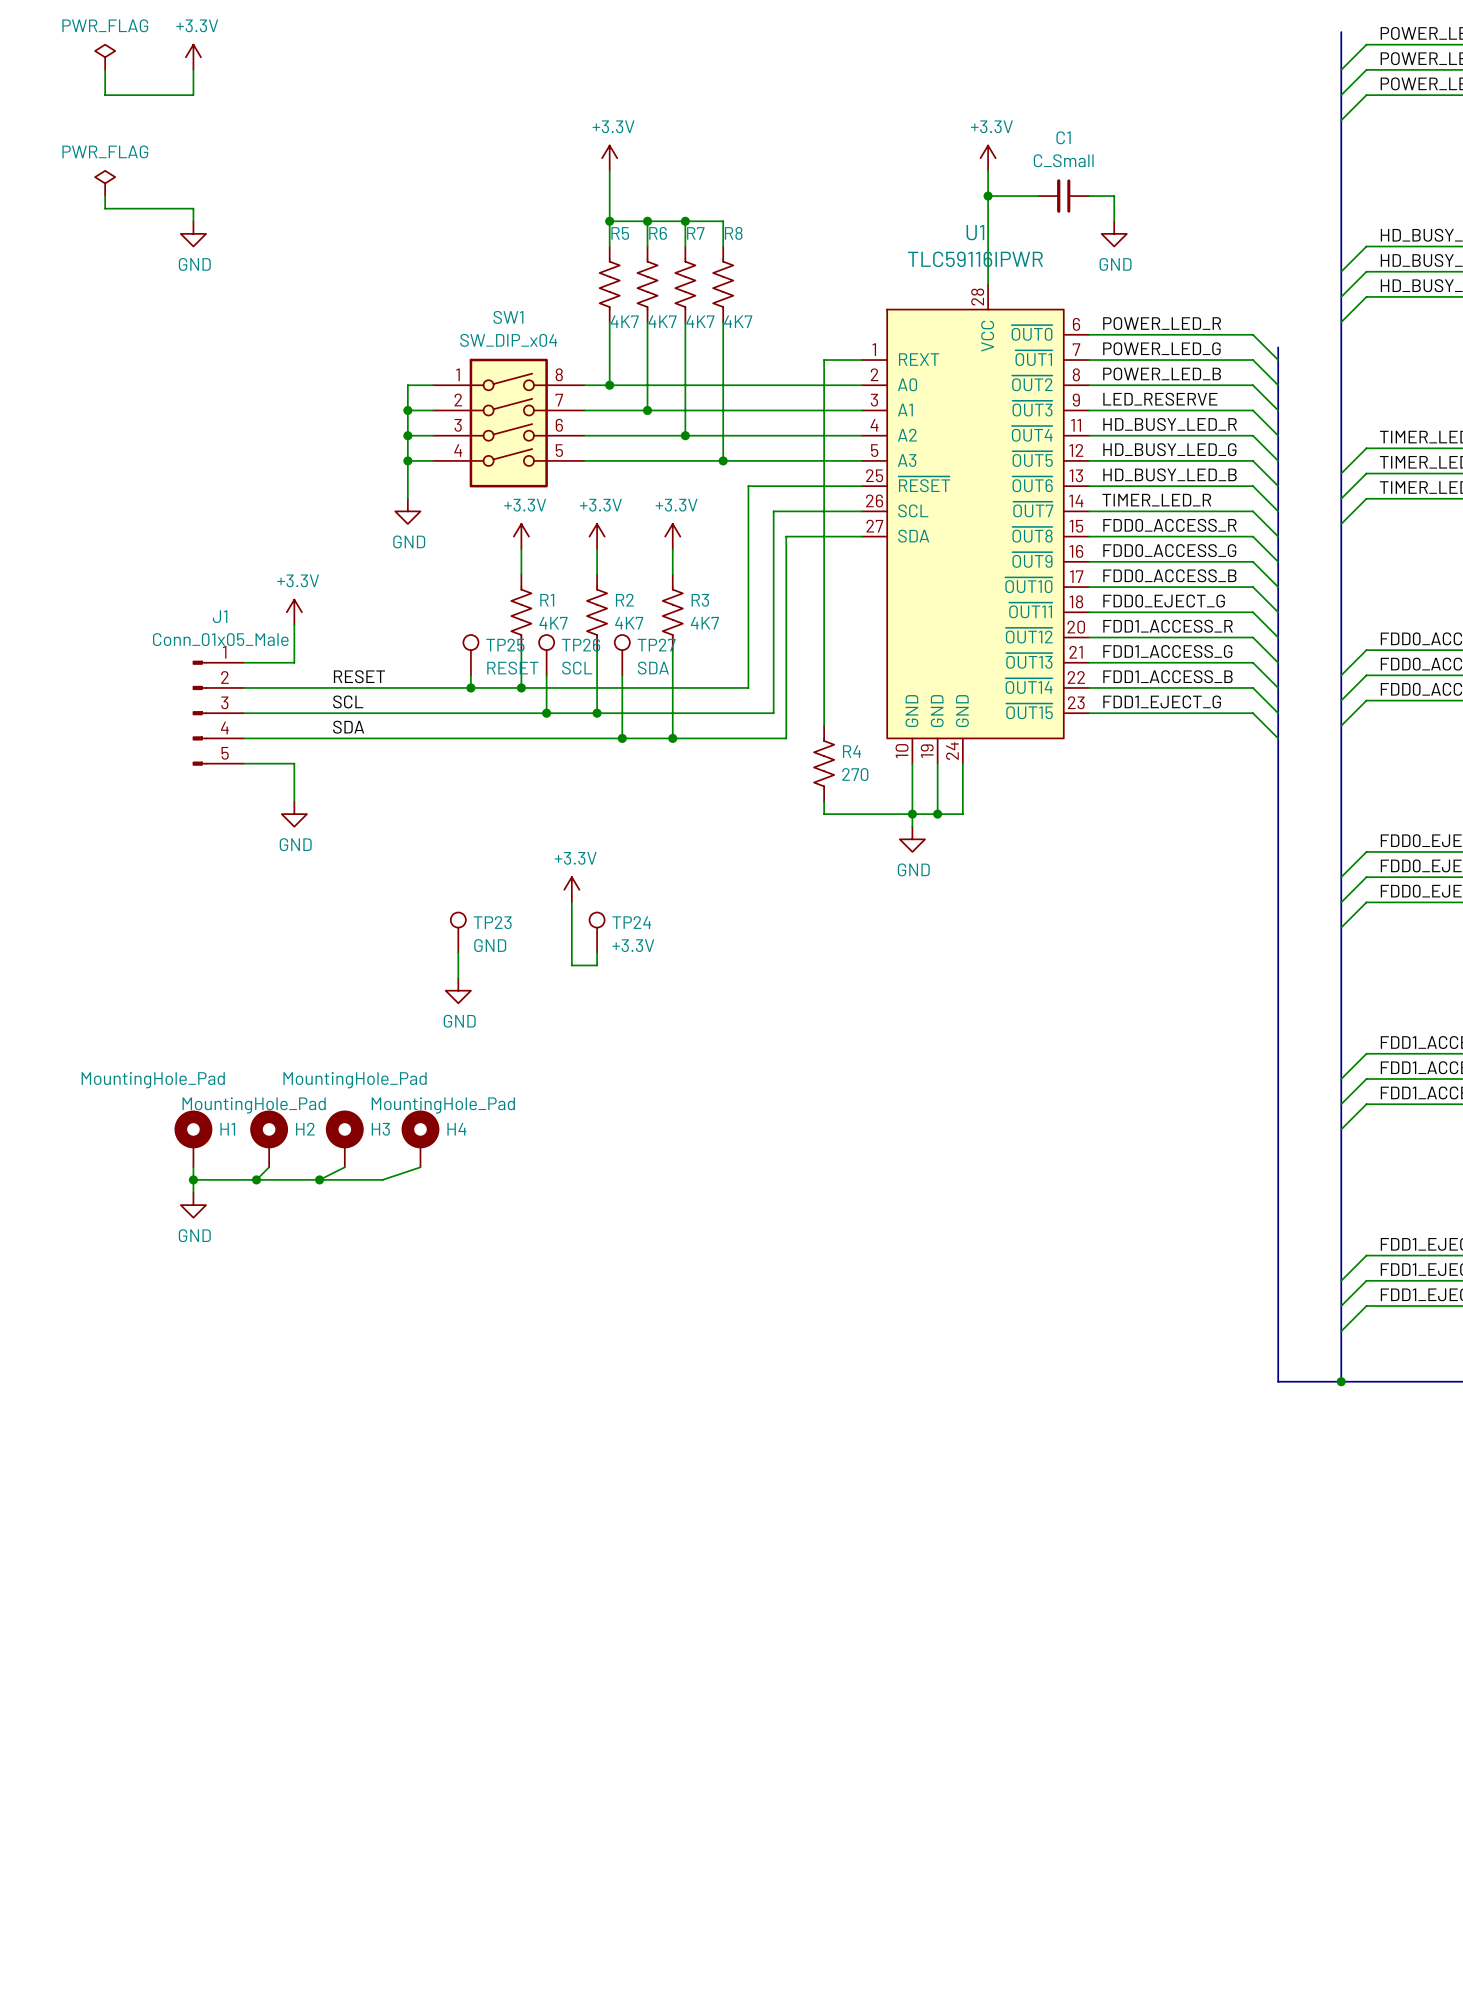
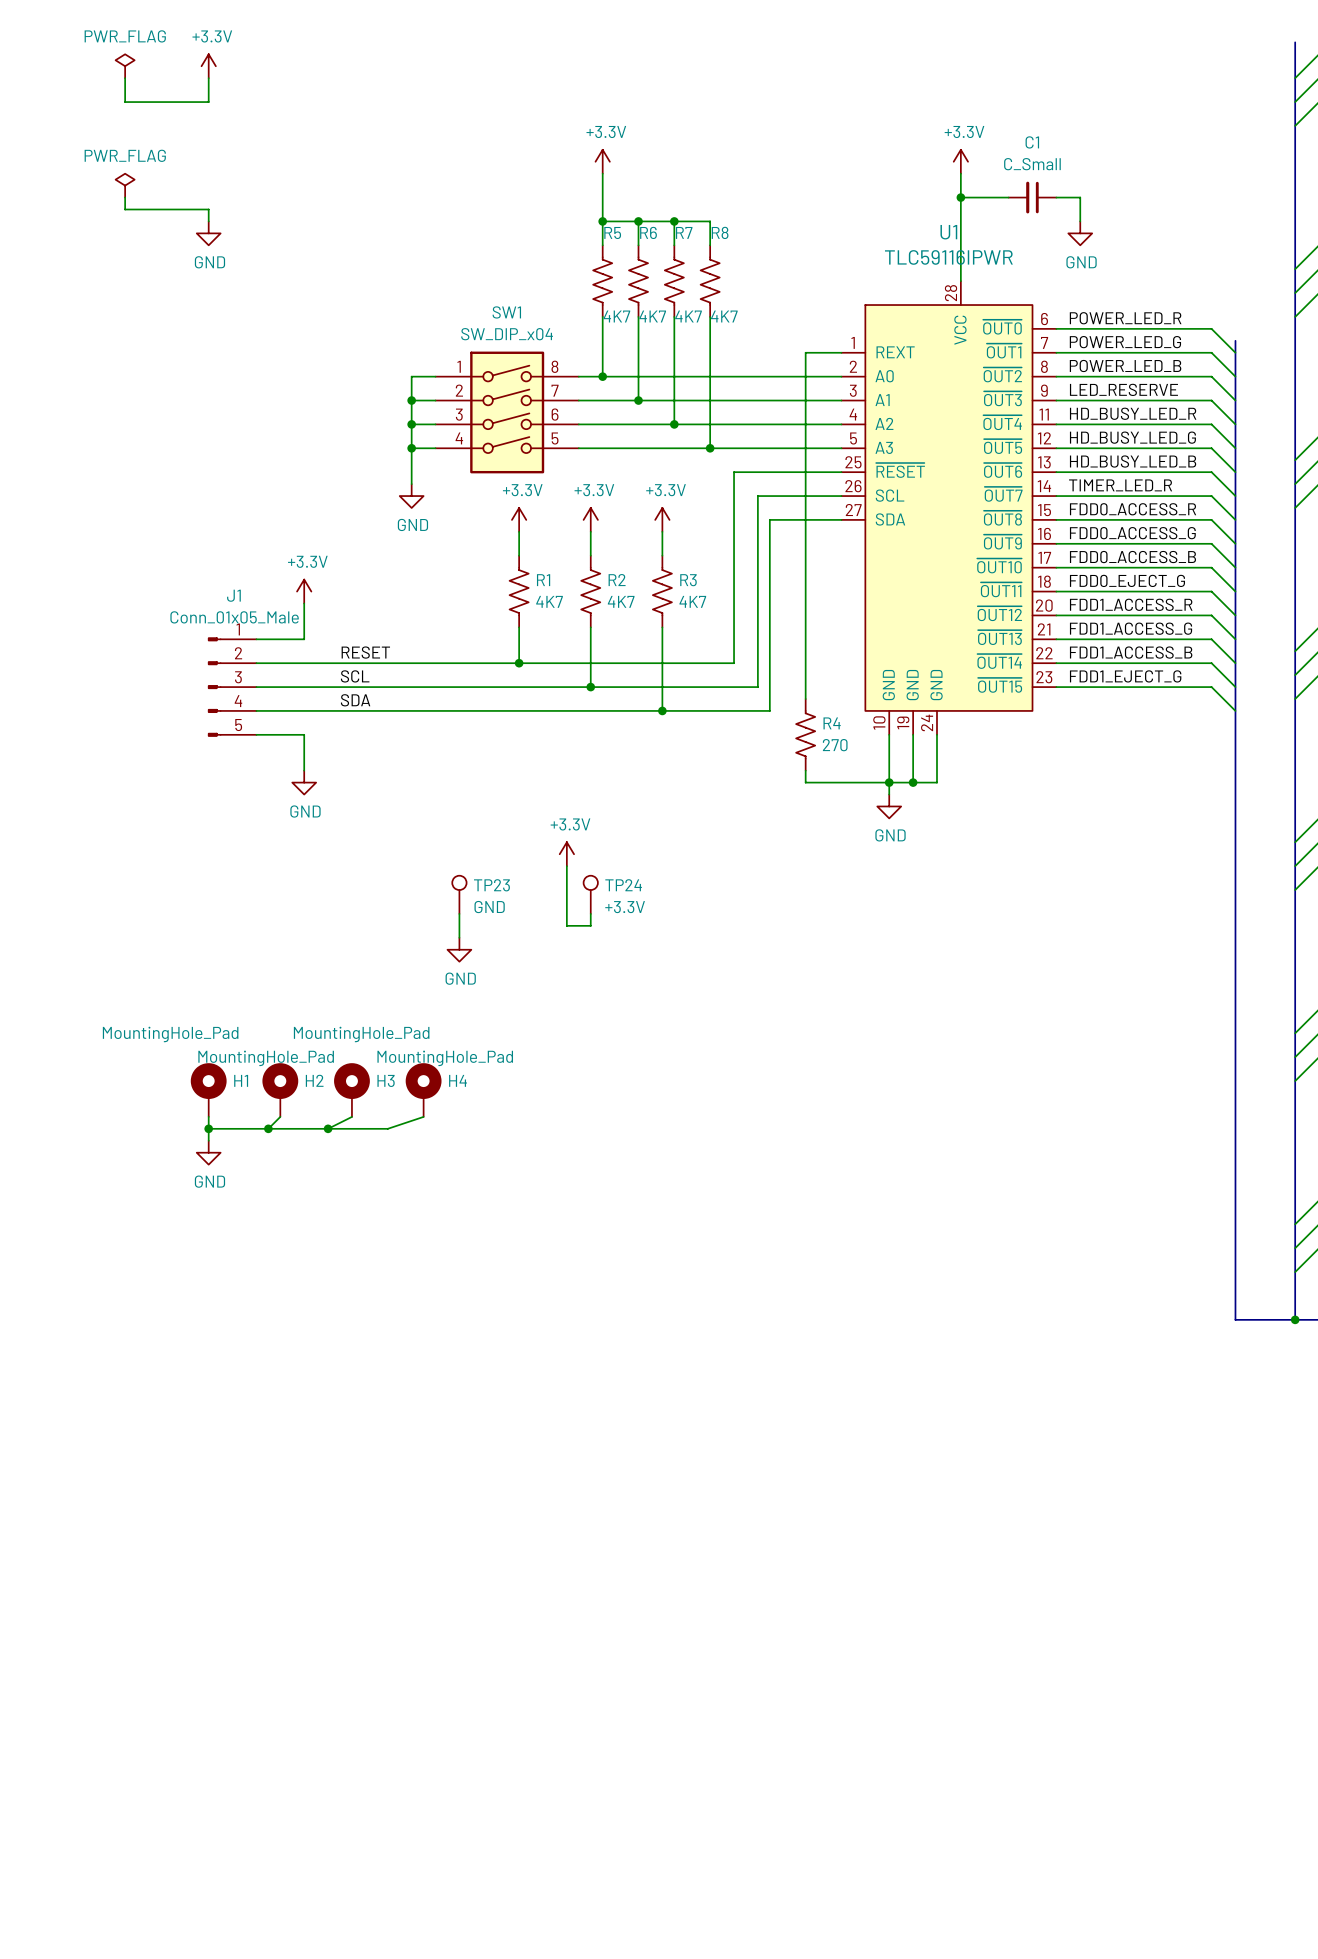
TP25: RESET (470, 655) -> none
TP26: SCL (546, 655) -> none
TP27: SDA (622, 655) -> none
wire: (470, 675) (470, 687) -> none
wire: (546, 675) (546, 713) -> none
wire: (622, 675) (622, 738) -> none
junction: (470, 687) -> none
junction: (546, 713) -> none
junction: (622, 738) -> none

